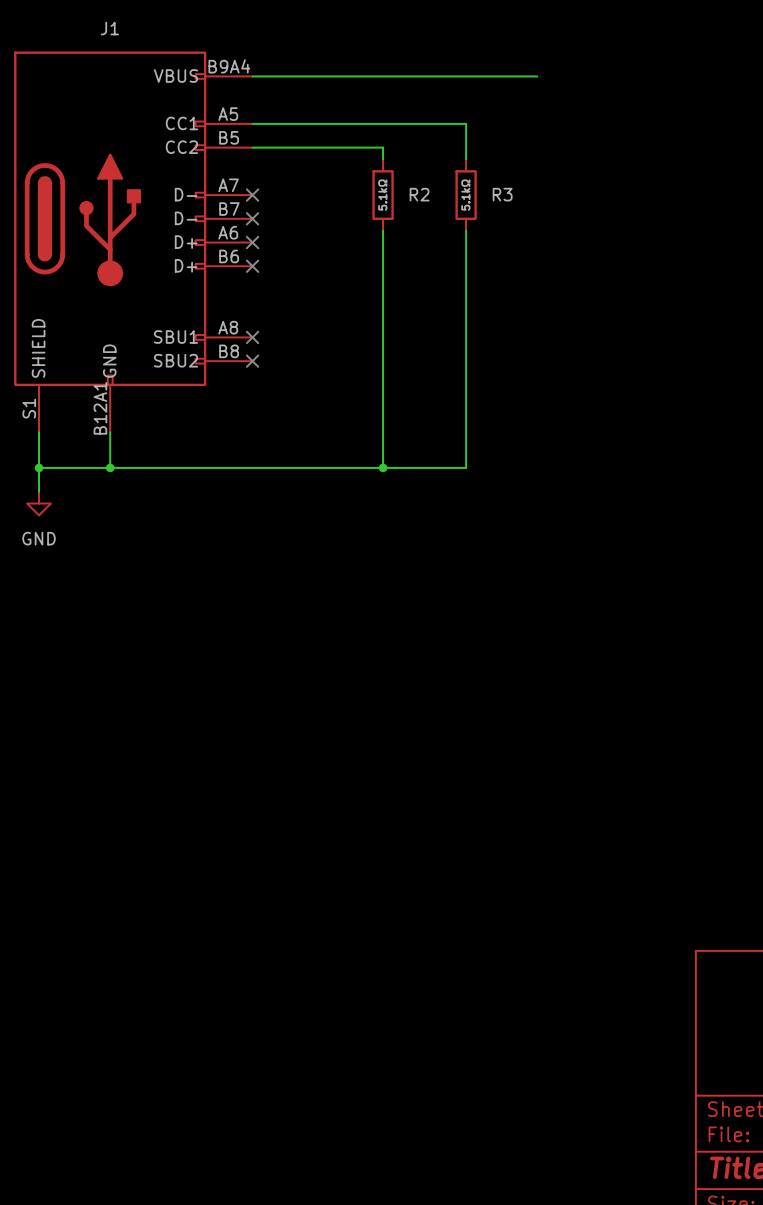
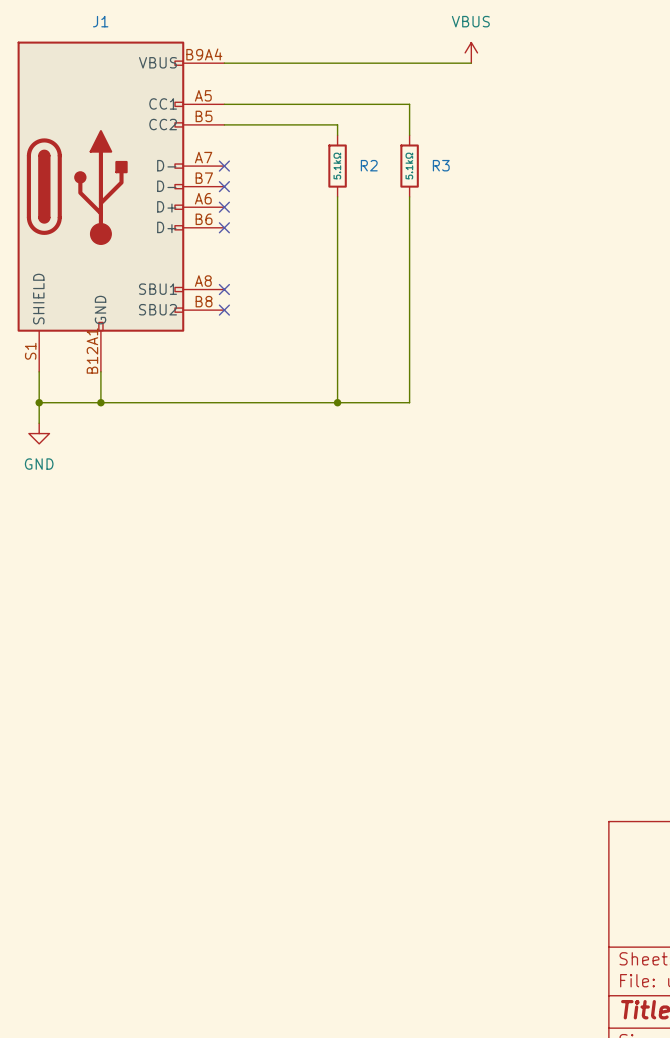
power symbol: none -> VBUS (471, 52)

